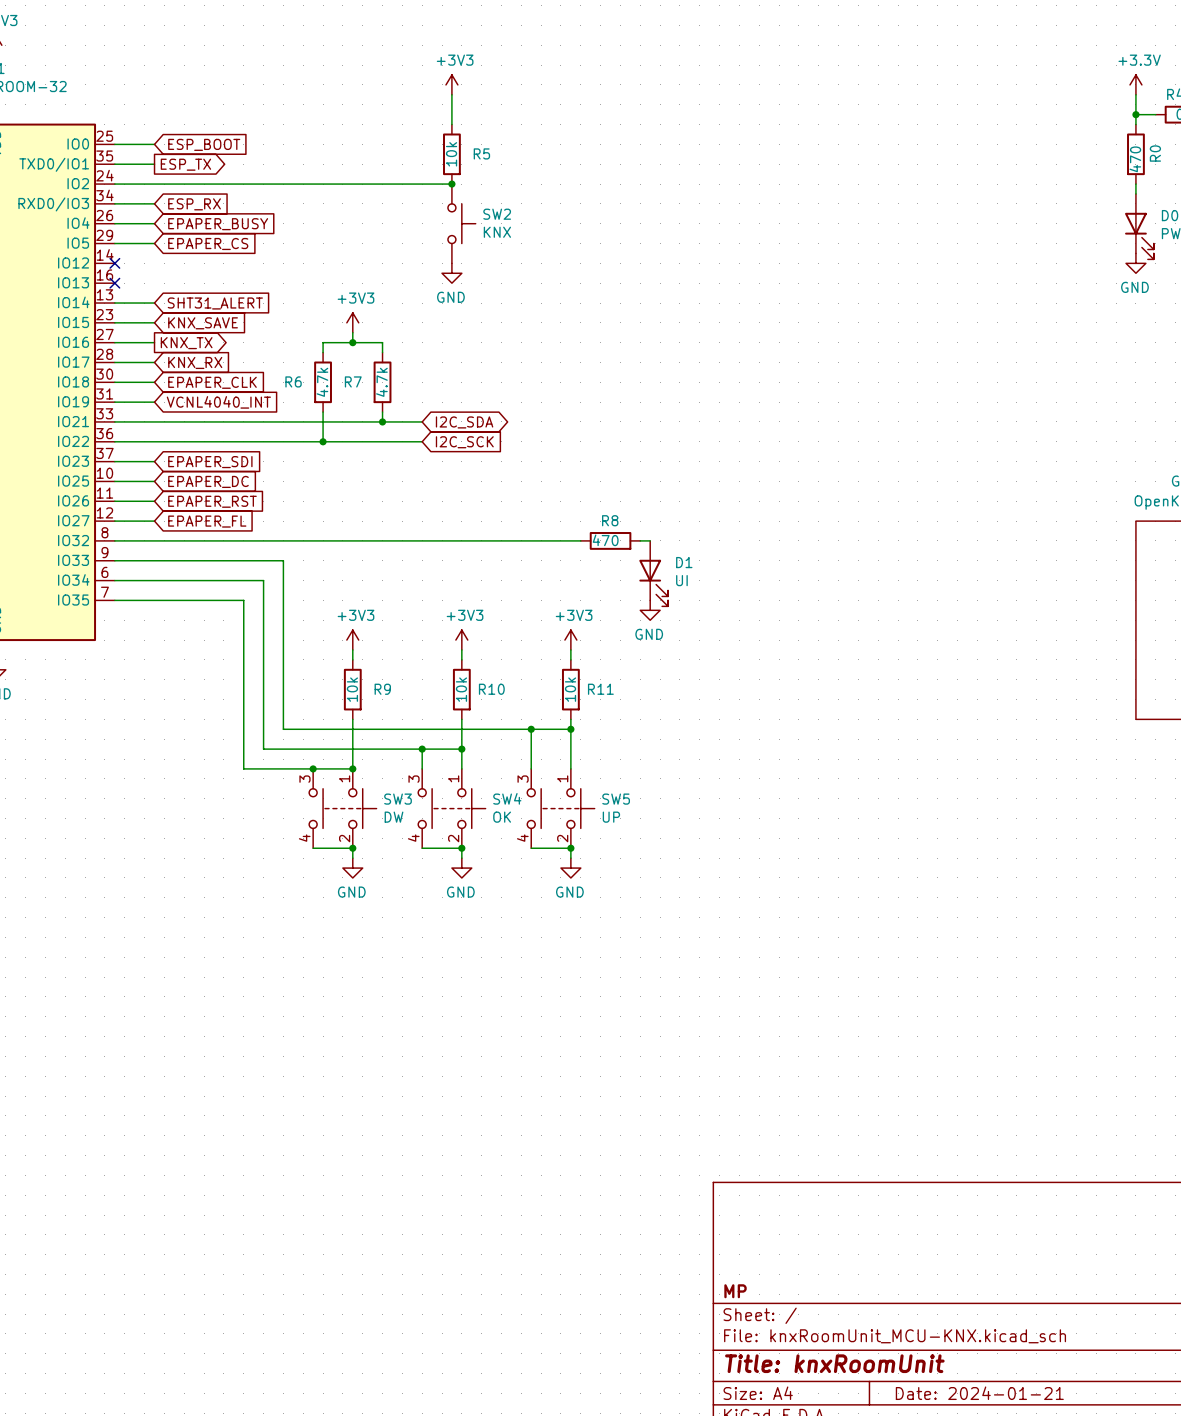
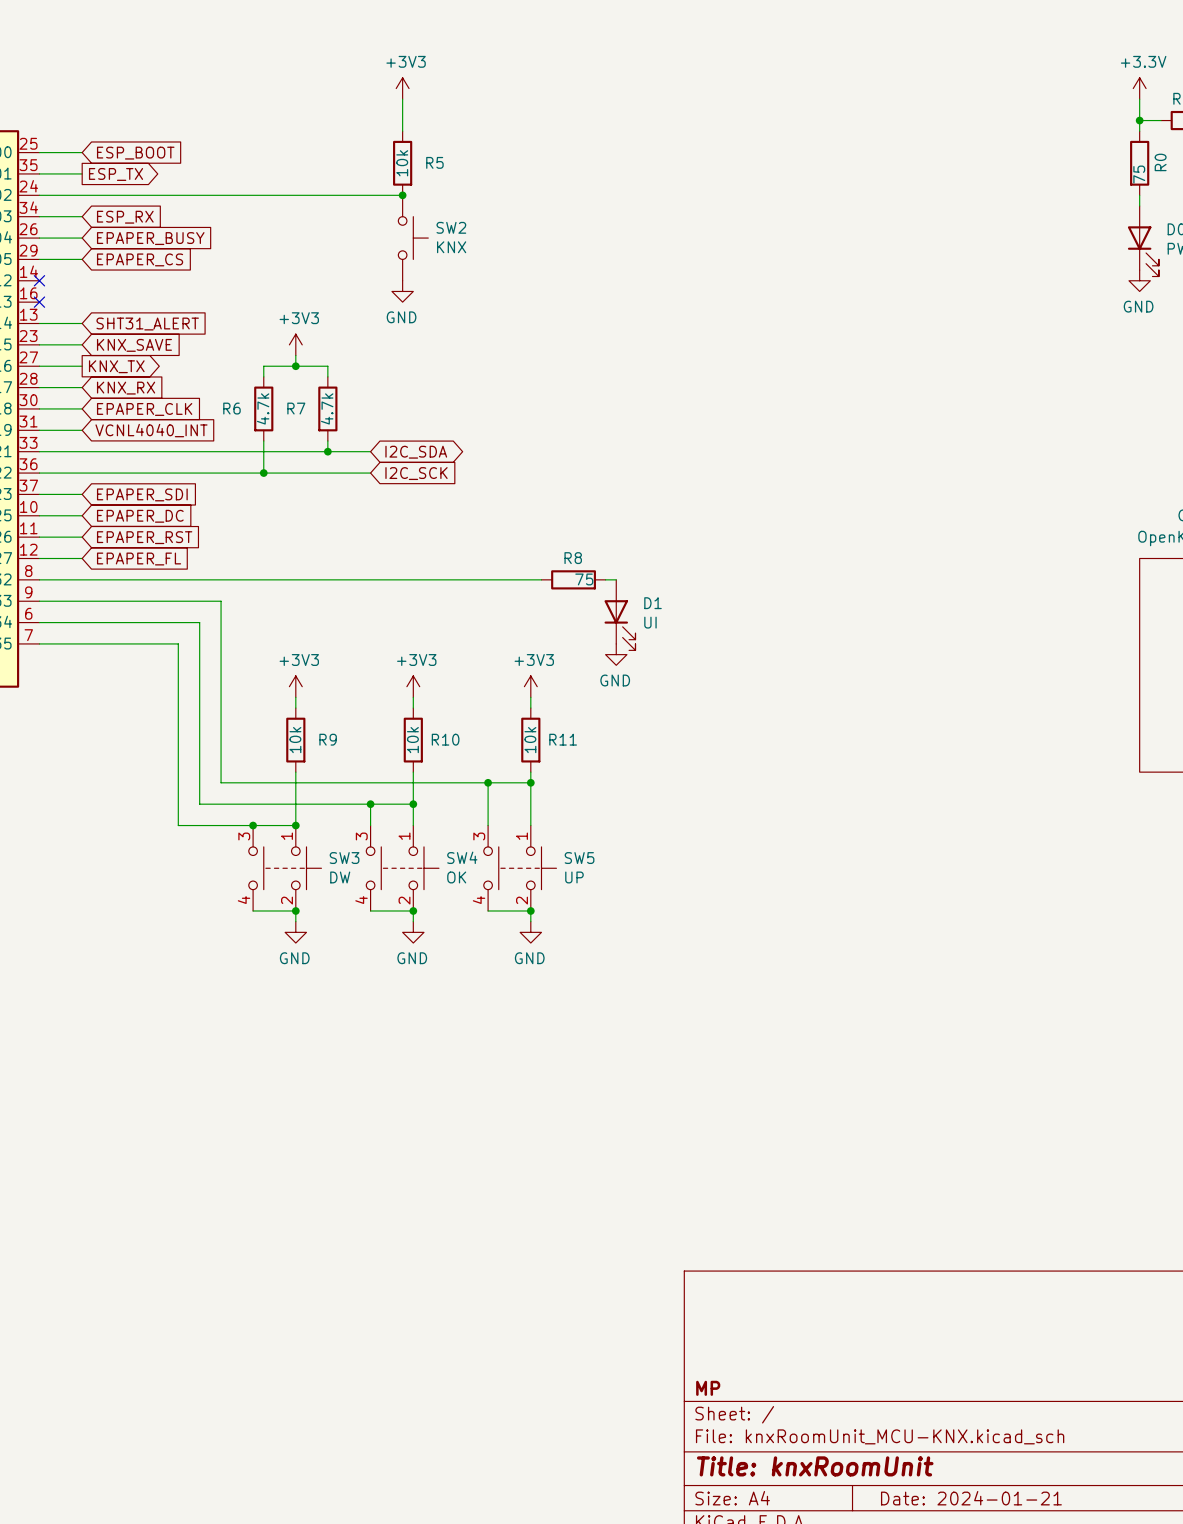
R0 value: 470 (1135, 159) -> 75 (1139, 174)
R8 value: 470 (605, 540) -> 75 (584, 579)

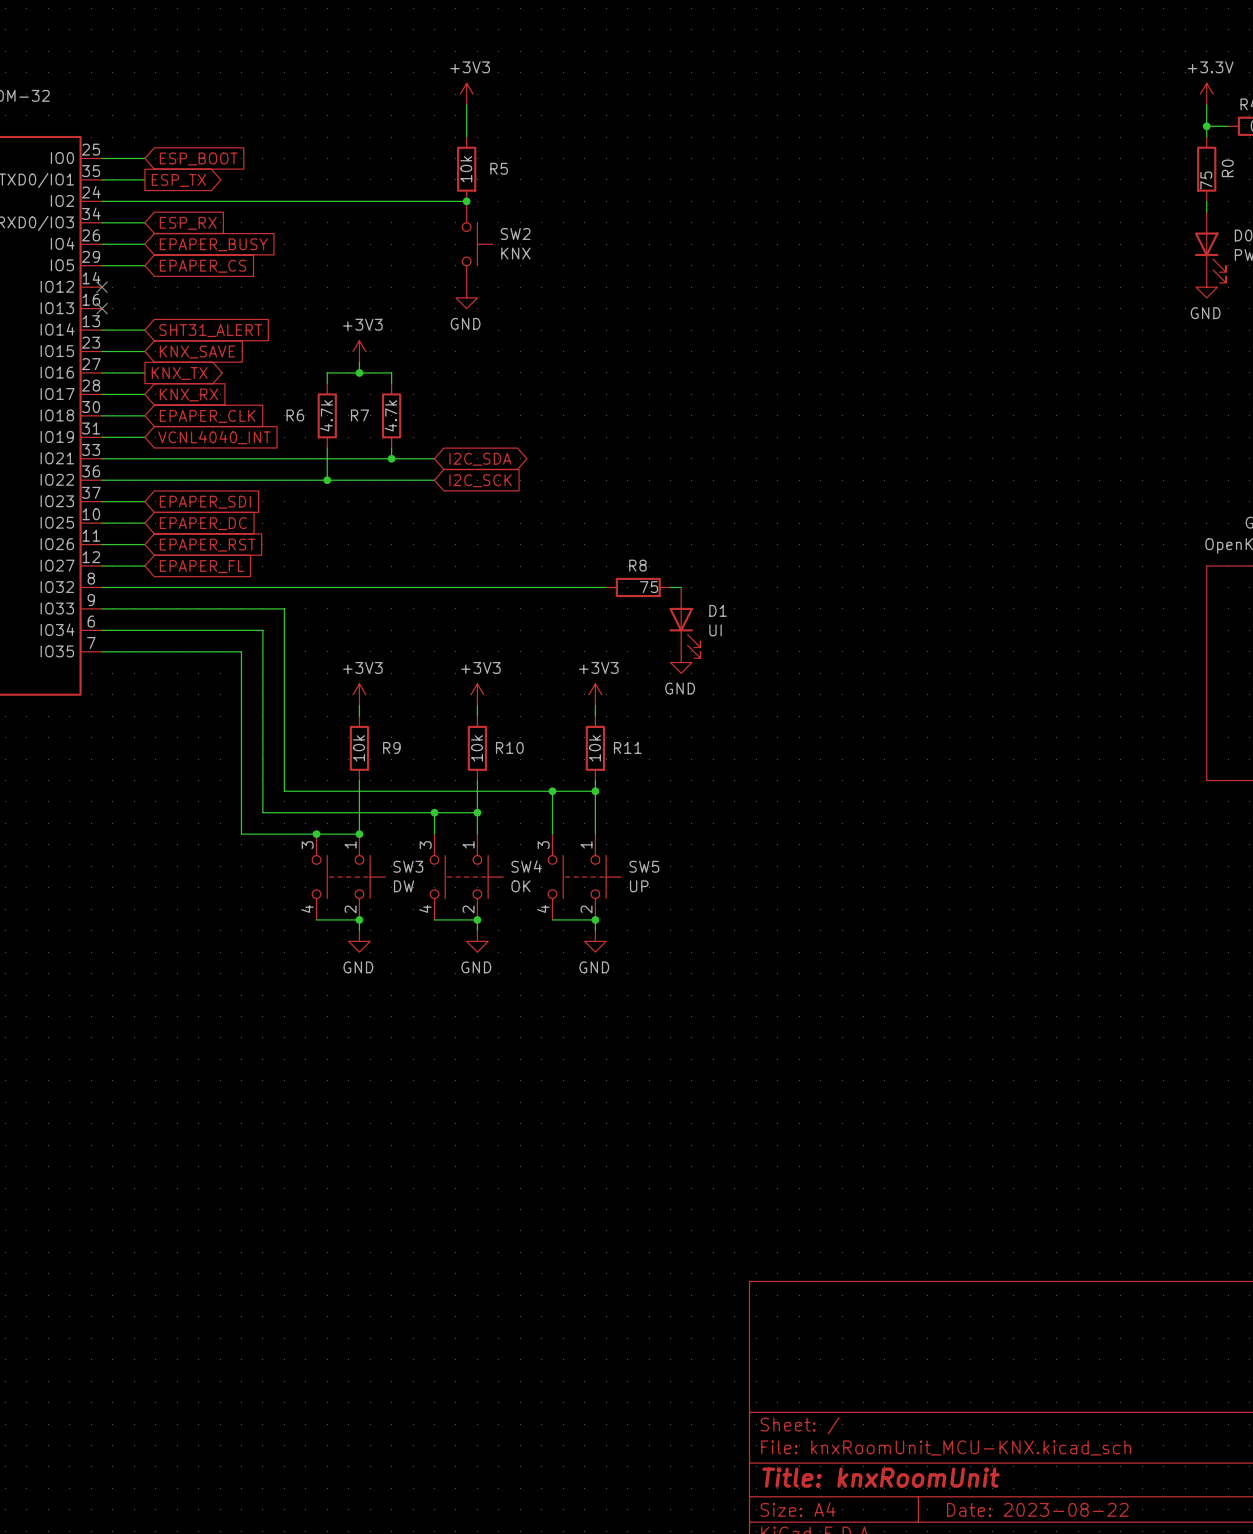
title block: MP (708, 1388) -> none
title block: Date: 2024-01-21 (971, 1498) -> Date: 2023-08-22 (1037, 1509)

